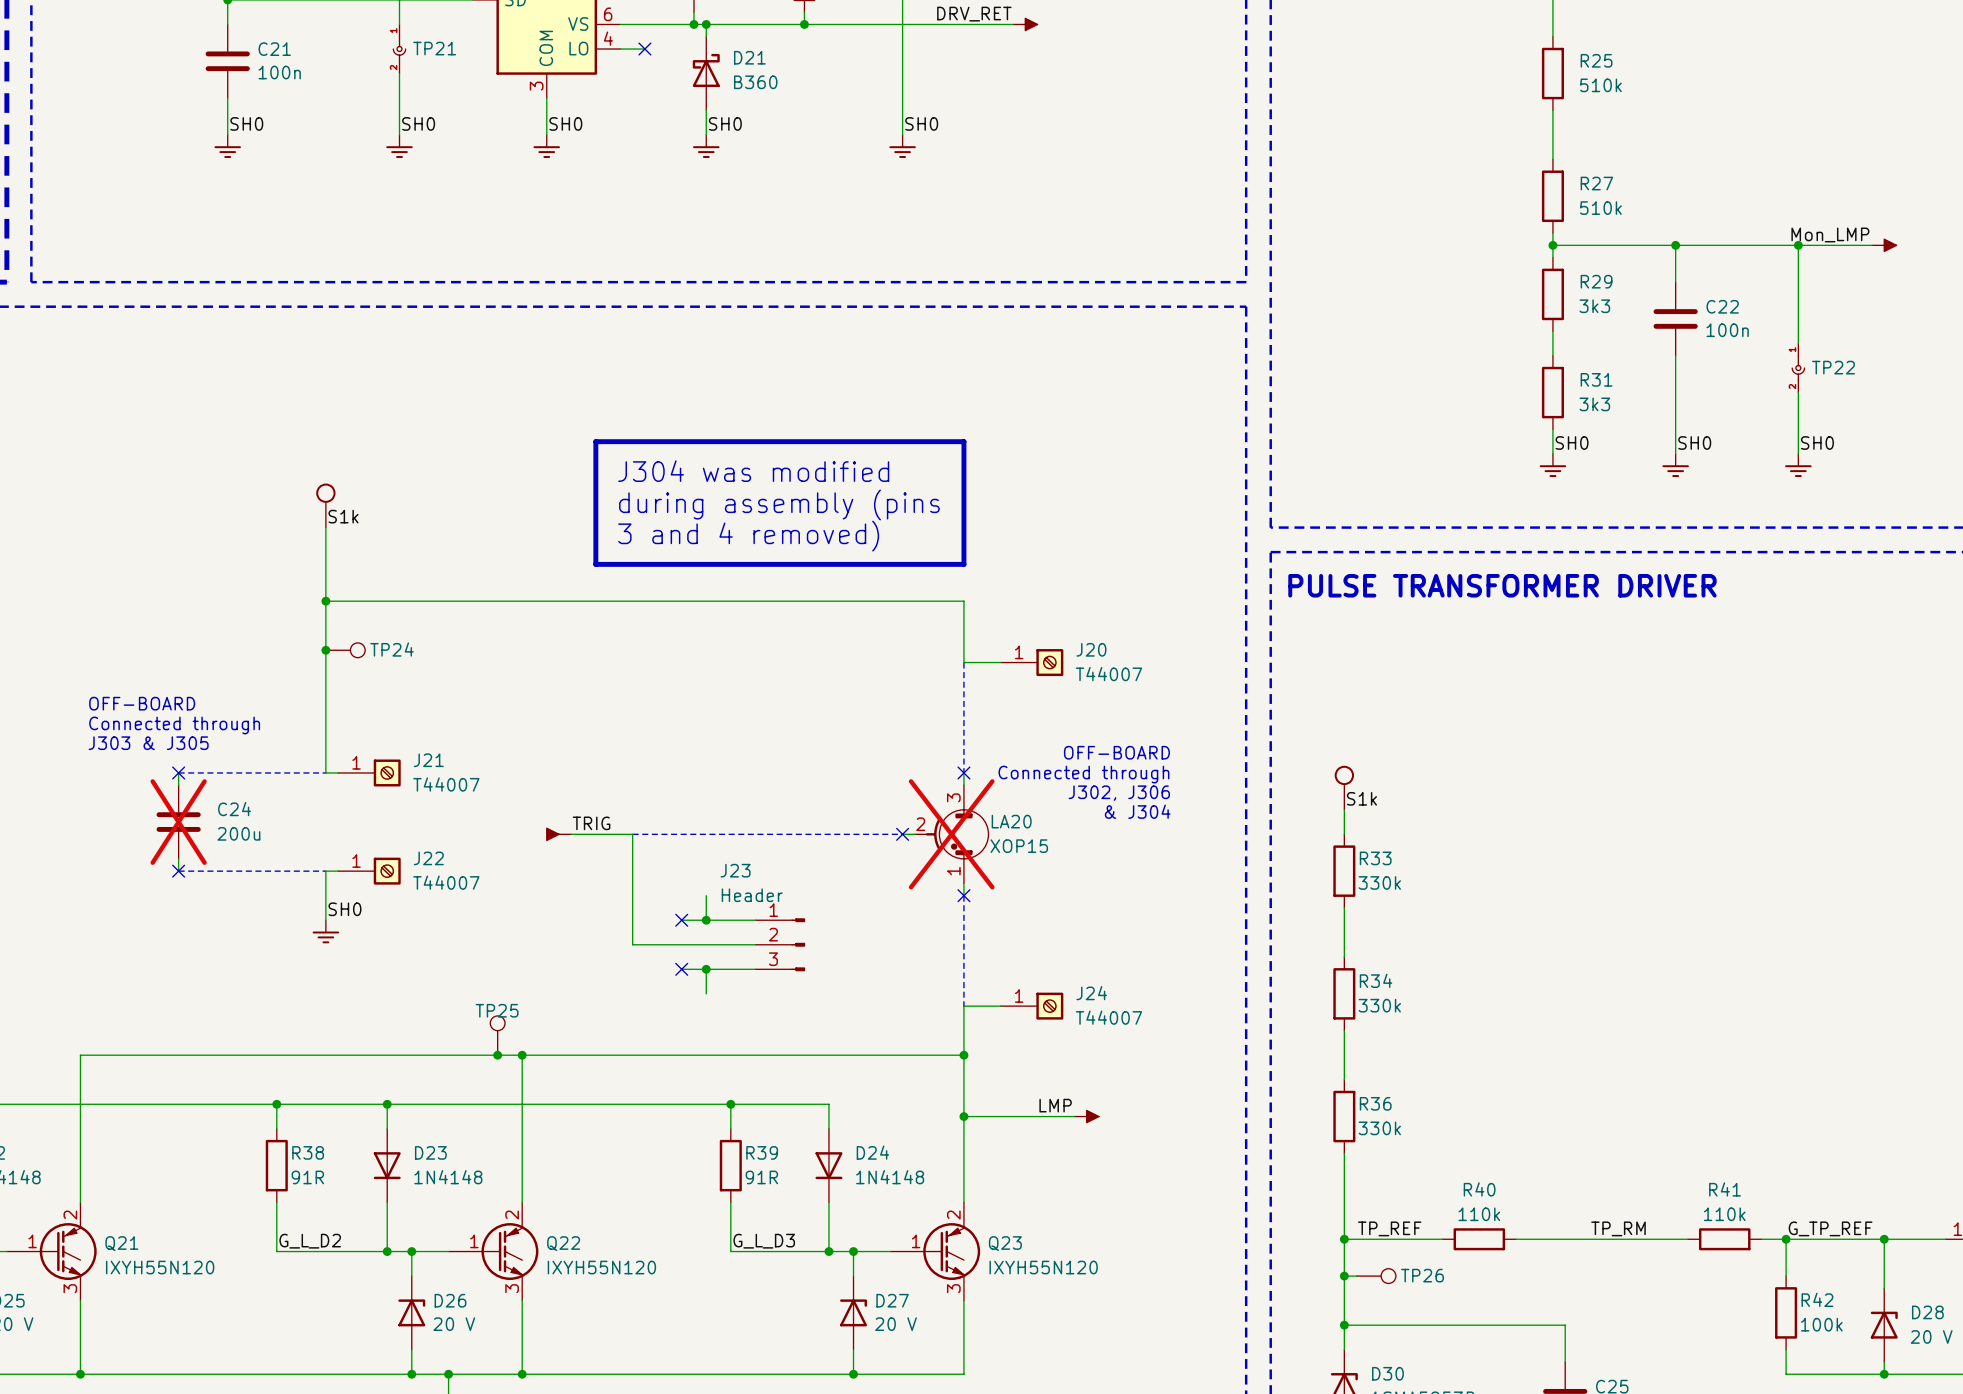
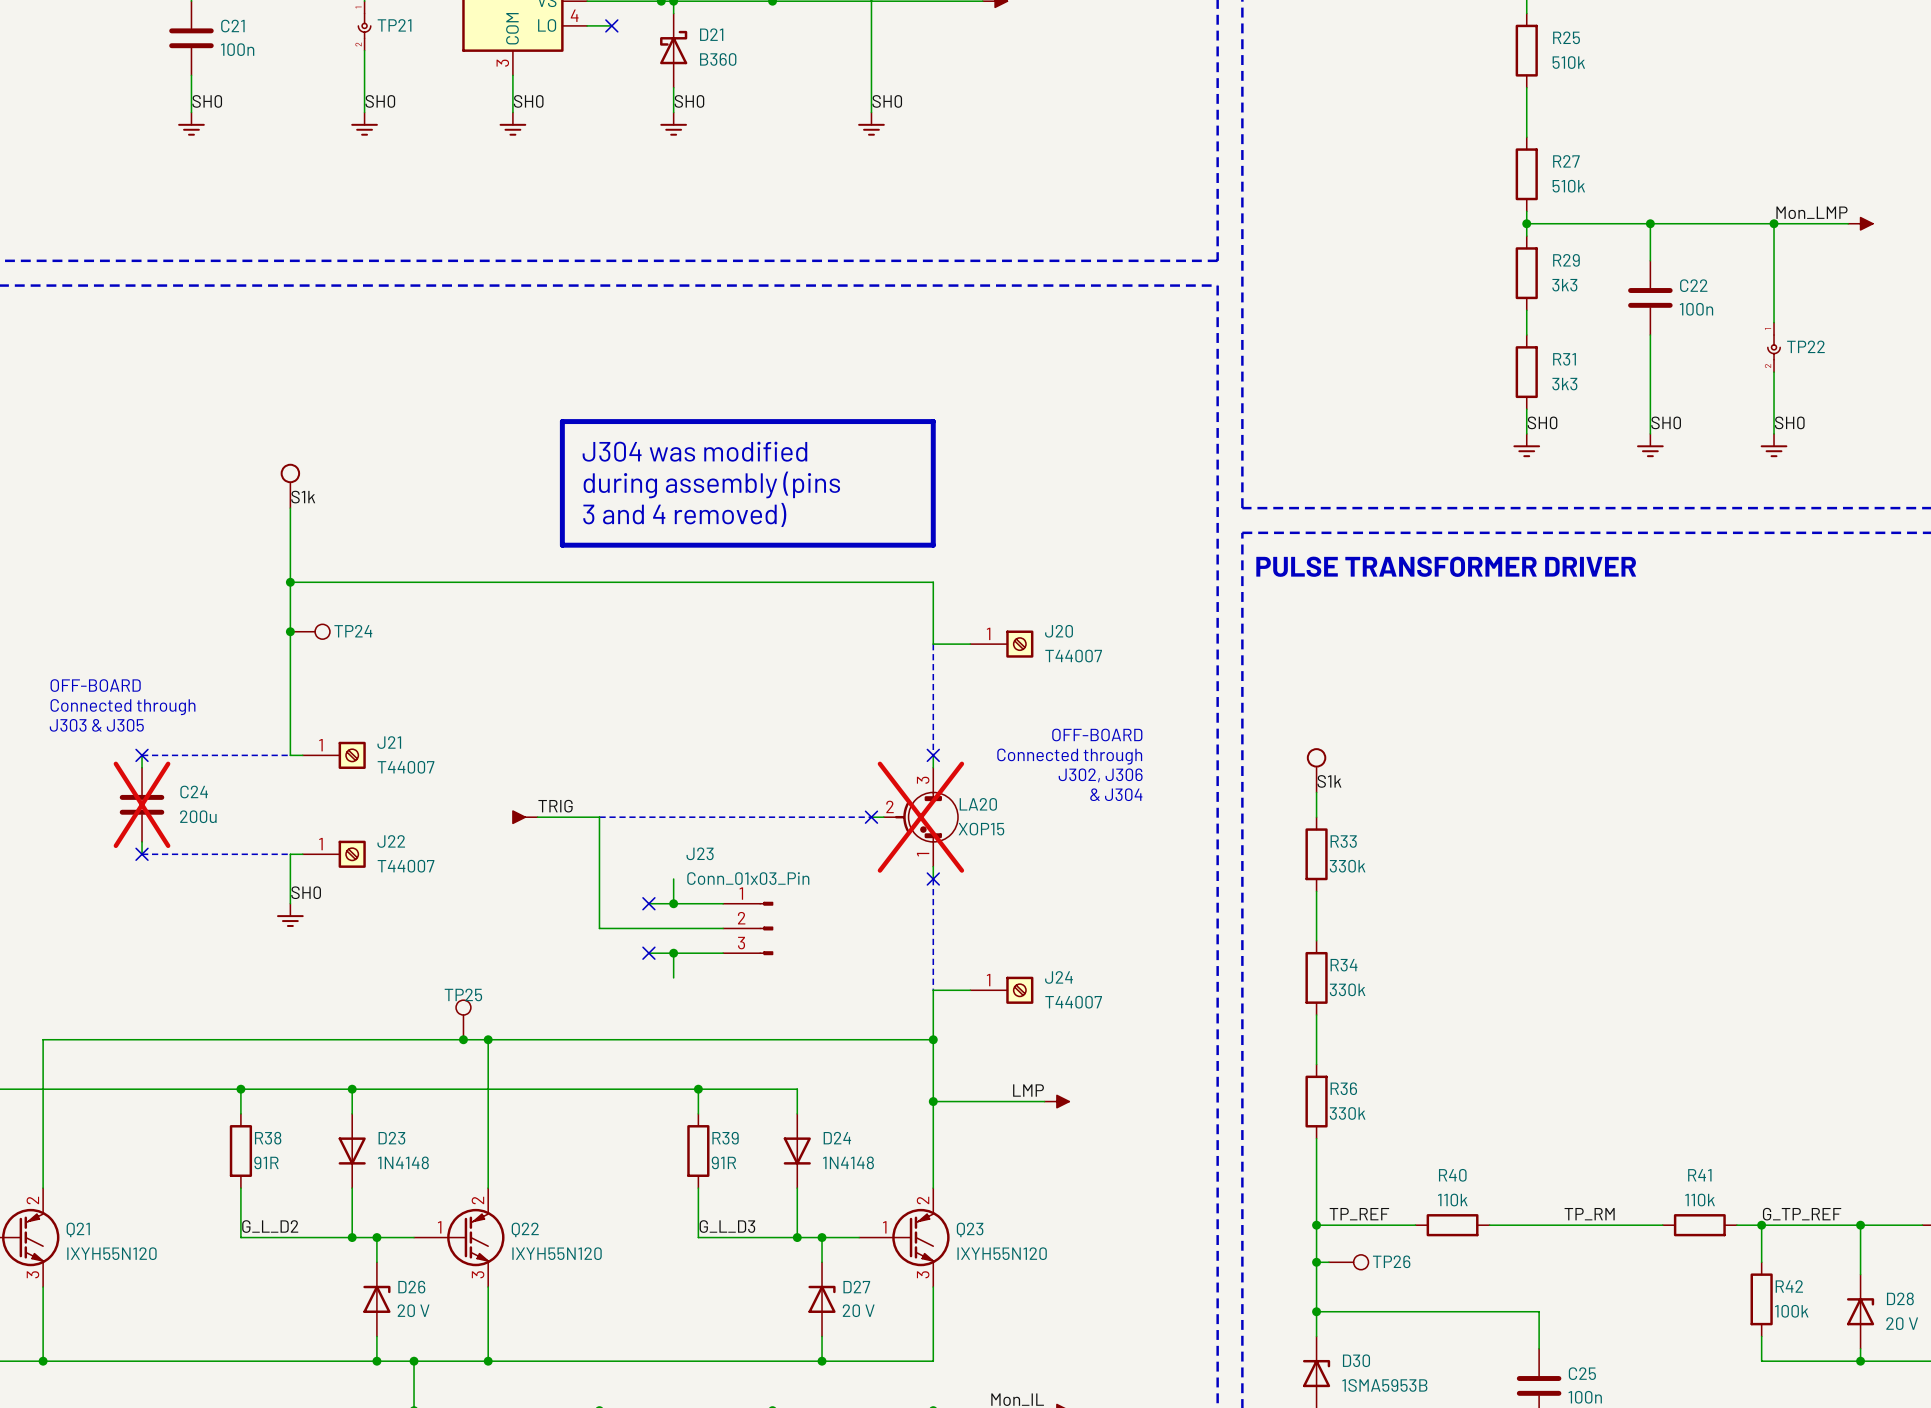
J23 value: Header (752, 895) -> Conn_01x03_Pin (748, 878)

